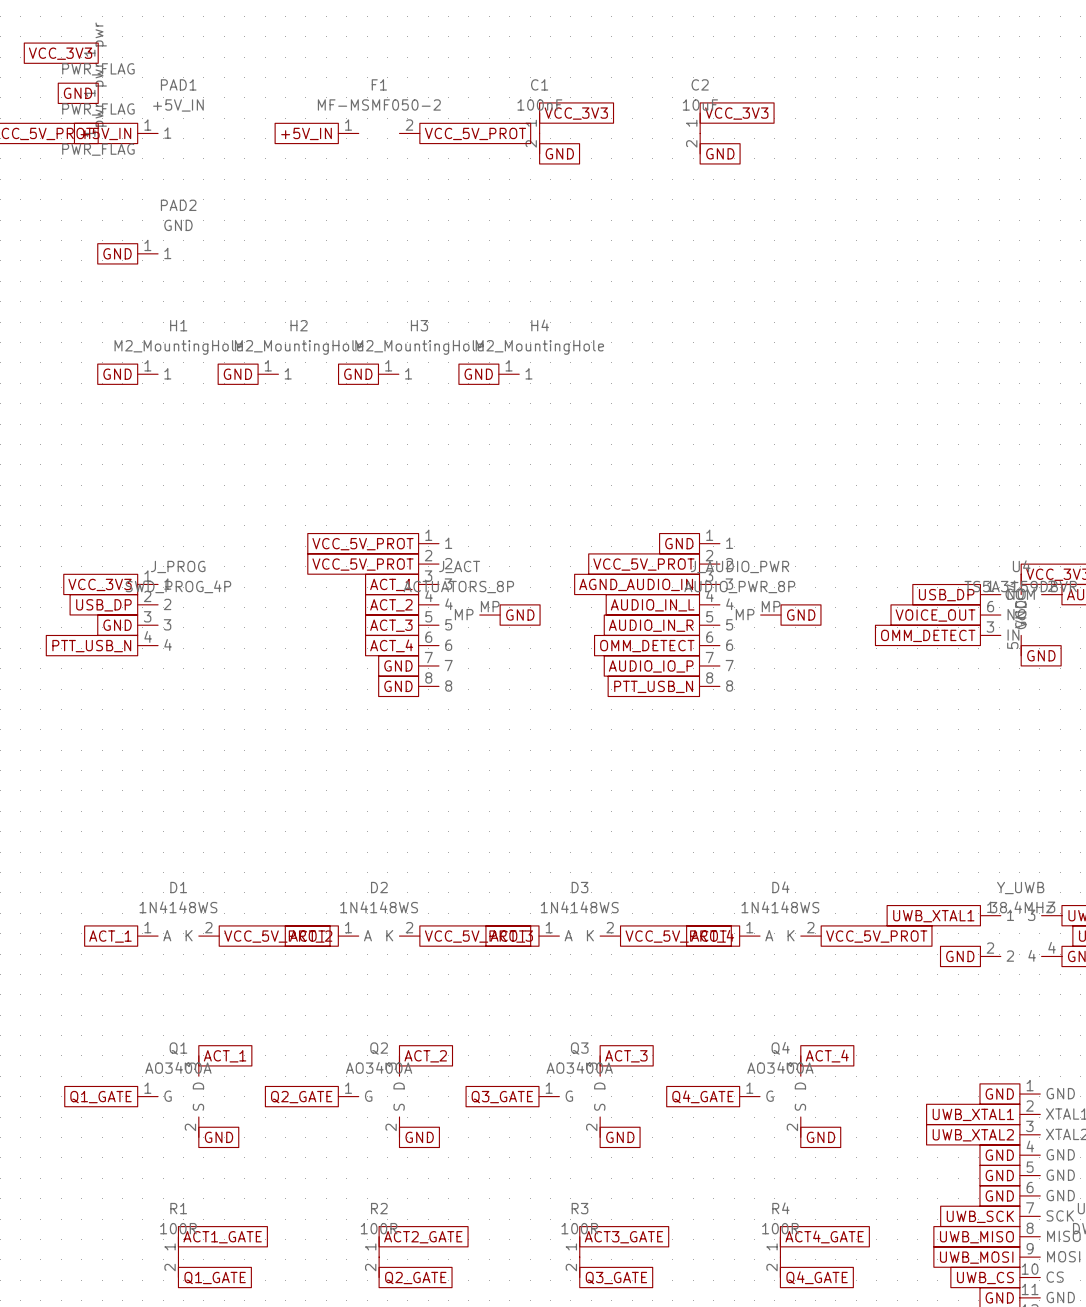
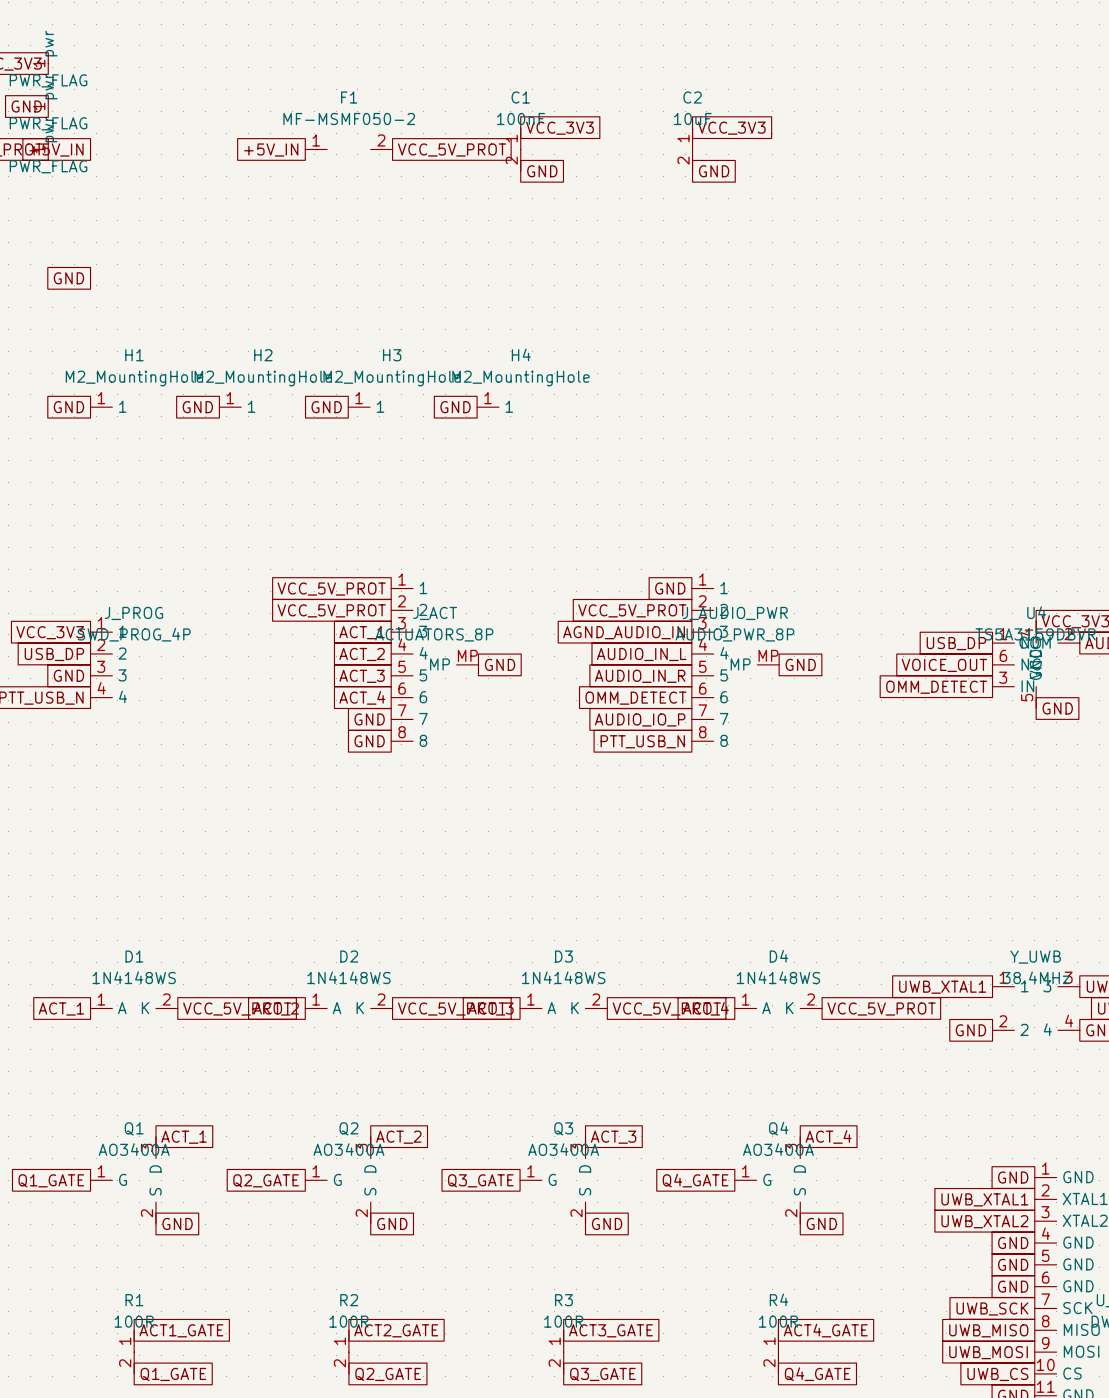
PAD1: +5V_IN (147, 133) -> none
PAD2: GND (147, 253) -> none

